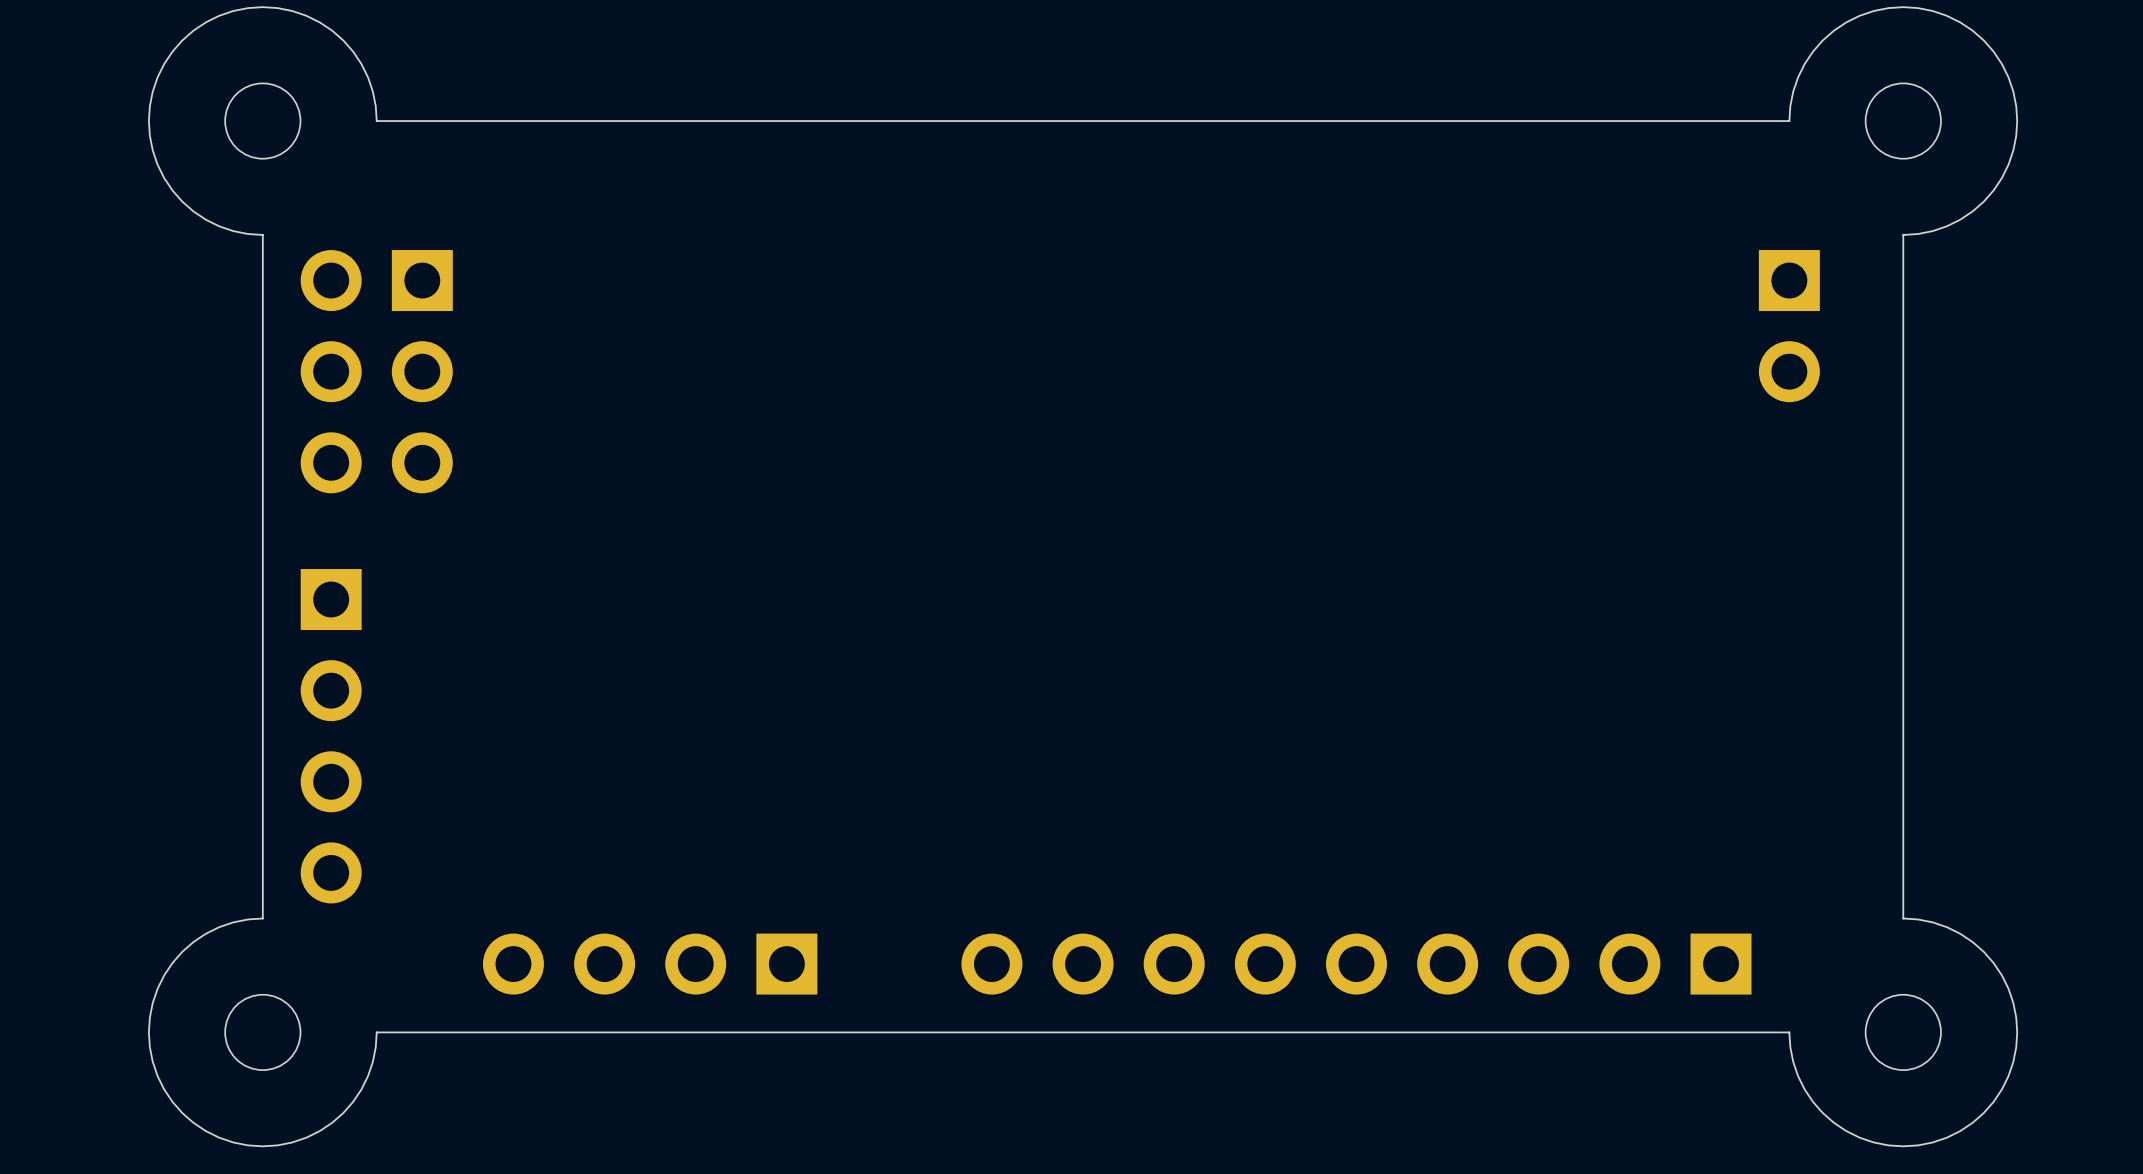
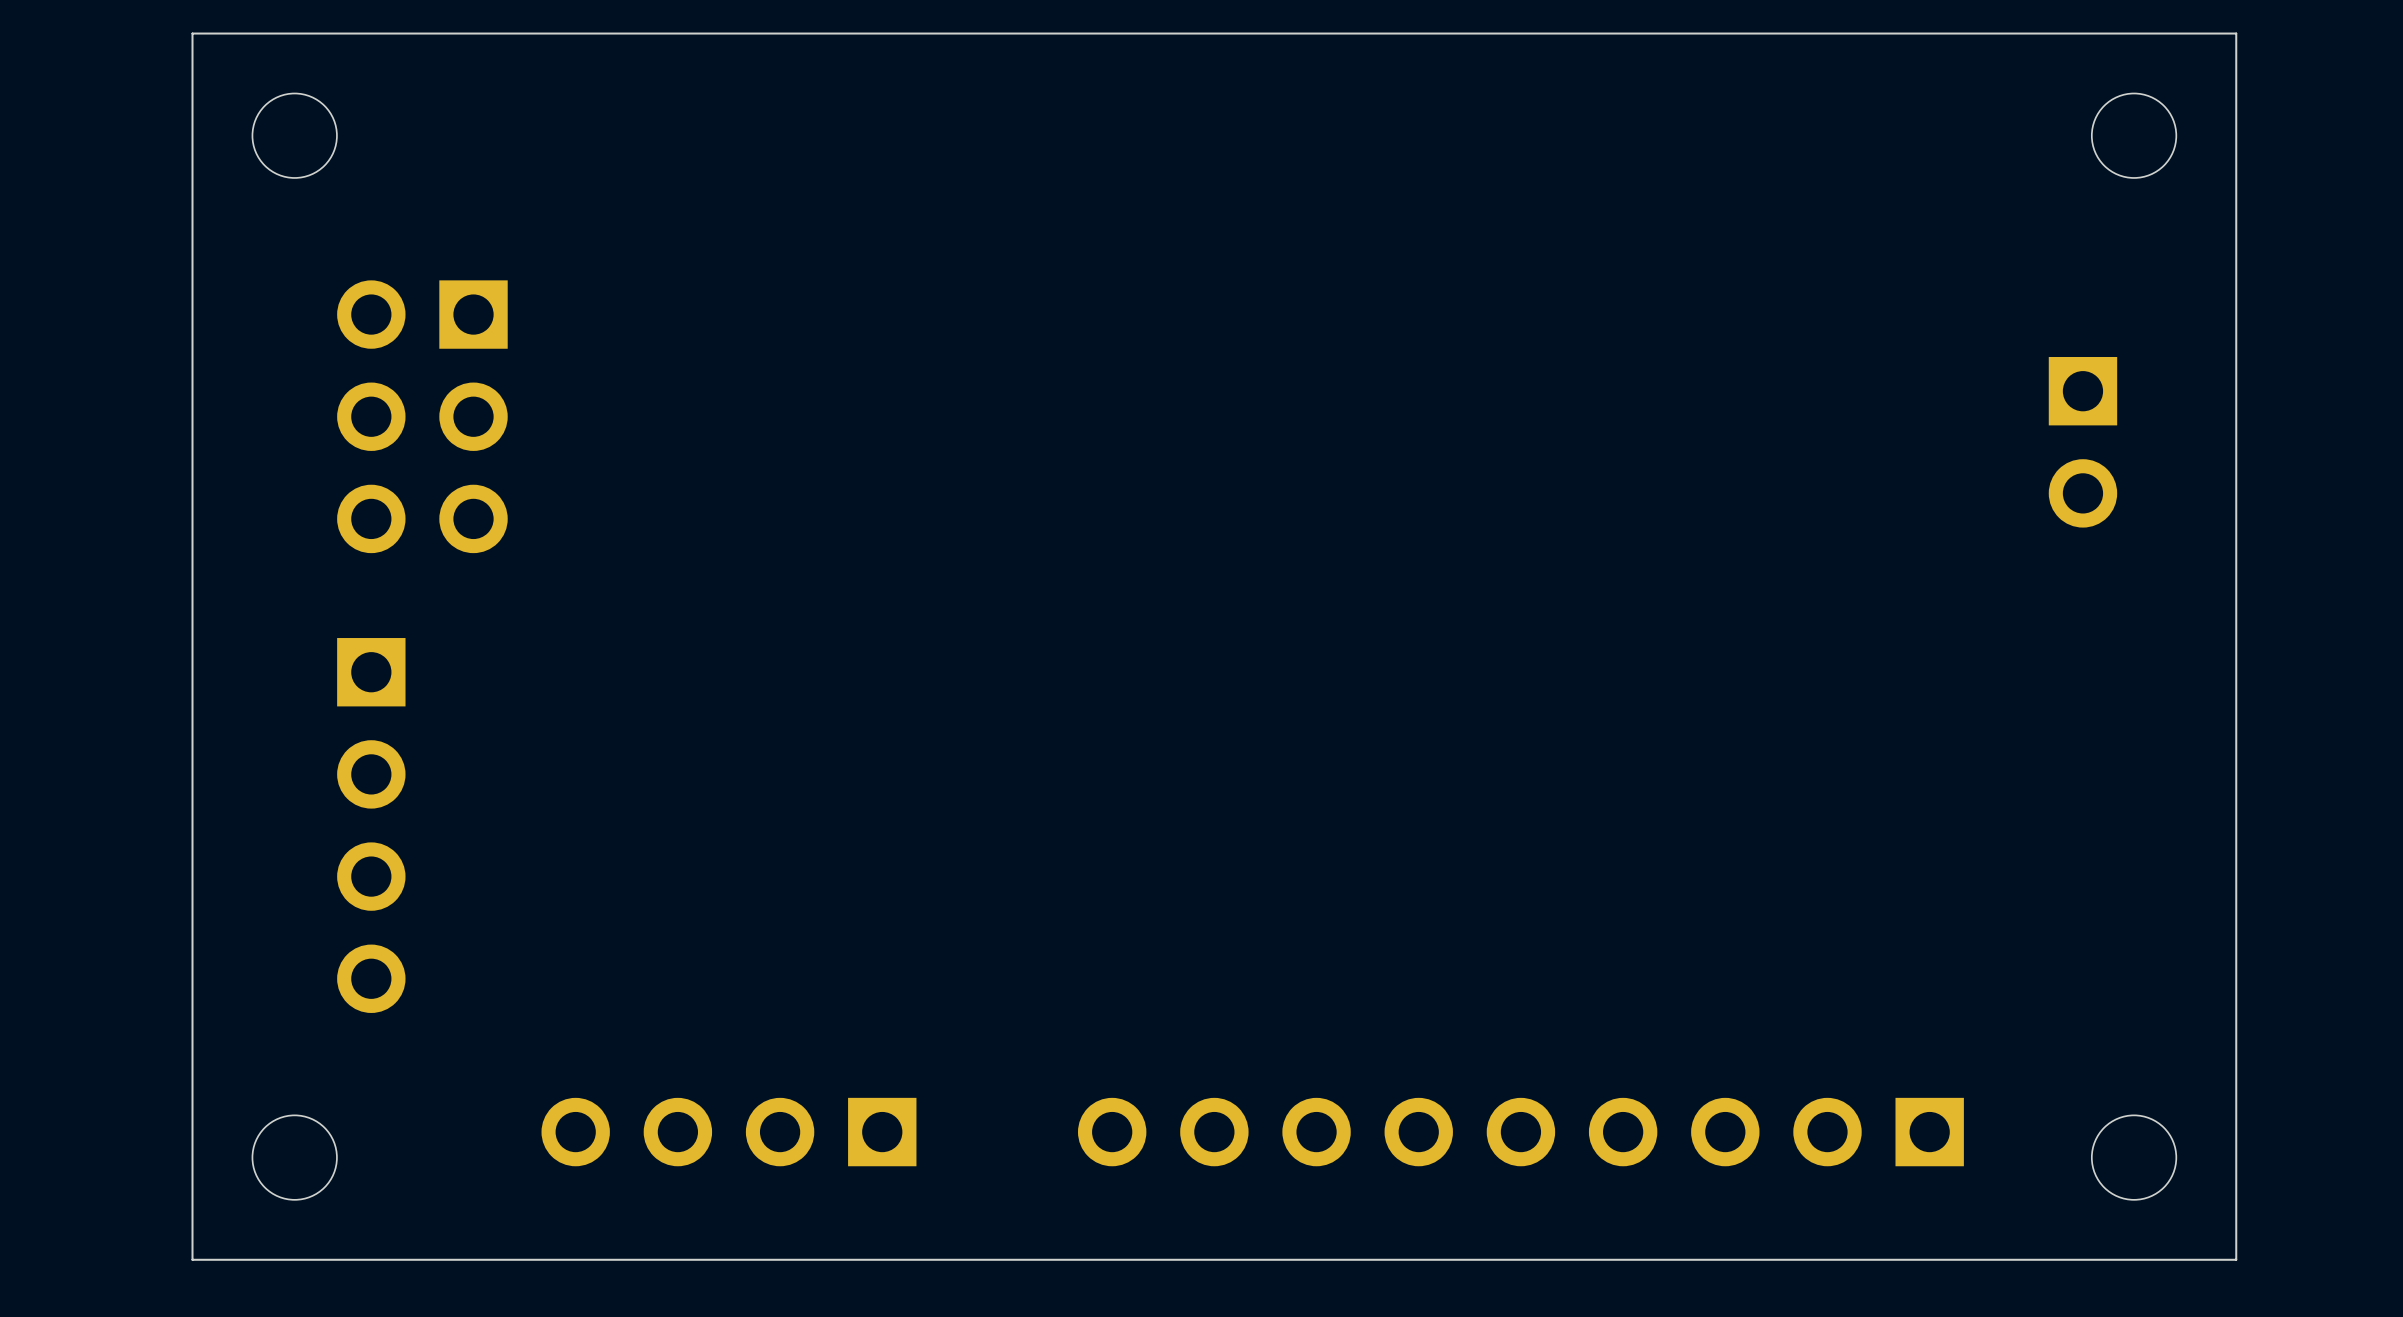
board edge: (1789, 121) (376, 121) (372, 91) (361, 64) (343, 40) (319, 22) (292, 11) (262, 7) (233, 11) (205, 22) (182, 40) (164, 64) (152, 91) (148, 121) (149, 135) (157, 164) (172, 190) (182, 201) (205, 219) (219, 226) (247, 234) (262, 234) (262, 918) (233, 922) (205, 933) (182, 951) (164, 975) (152, 1002) (148, 1032) (152, 1061) (164, 1089) (182, 1112) (205, 1131) (233, 1142) (262, 1146) (292, 1142) (306, 1137) (332, 1122) (343, 1112) (353, 1101) (368, 1076) (372, 1061) (376, 1032) (1789, 1032) (1793, 1061) (1804, 1089) (1822, 1112) (1846, 1131) (1873, 1142) (1903, 1146) (1932, 1142) (1960, 1131) (1983, 1112) (2001, 1089) (2013, 1061) (2017, 1032) (2016, 1017) (2008, 988) (1993, 963) (1983, 951) (1960, 933) (1946, 927) (1932, 922) (1903, 918) (1903, 234) (1932, 231) (1960, 219) (1972, 211) (1993, 190) (2008, 164) (2013, 150) (2017, 121) (2016, 106) (2013, 91) (2001, 64) (1993, 51) (1972, 30) (1960, 22) (1932, 11) (1903, 7) (1888, 8) (1859, 15) (1846, 22) (1822, 40) (1812, 51) (1798, 77) (1793, 91) (1789, 121) -> (2236, 33) (2236, 1259) (192, 1259) (192, 33) (2236, 33)
part position: (1789, 326) -> (2082, 442)
part position: (650, 964) -> (728, 1132)
part position: (1356, 964) -> (1520, 1132)

